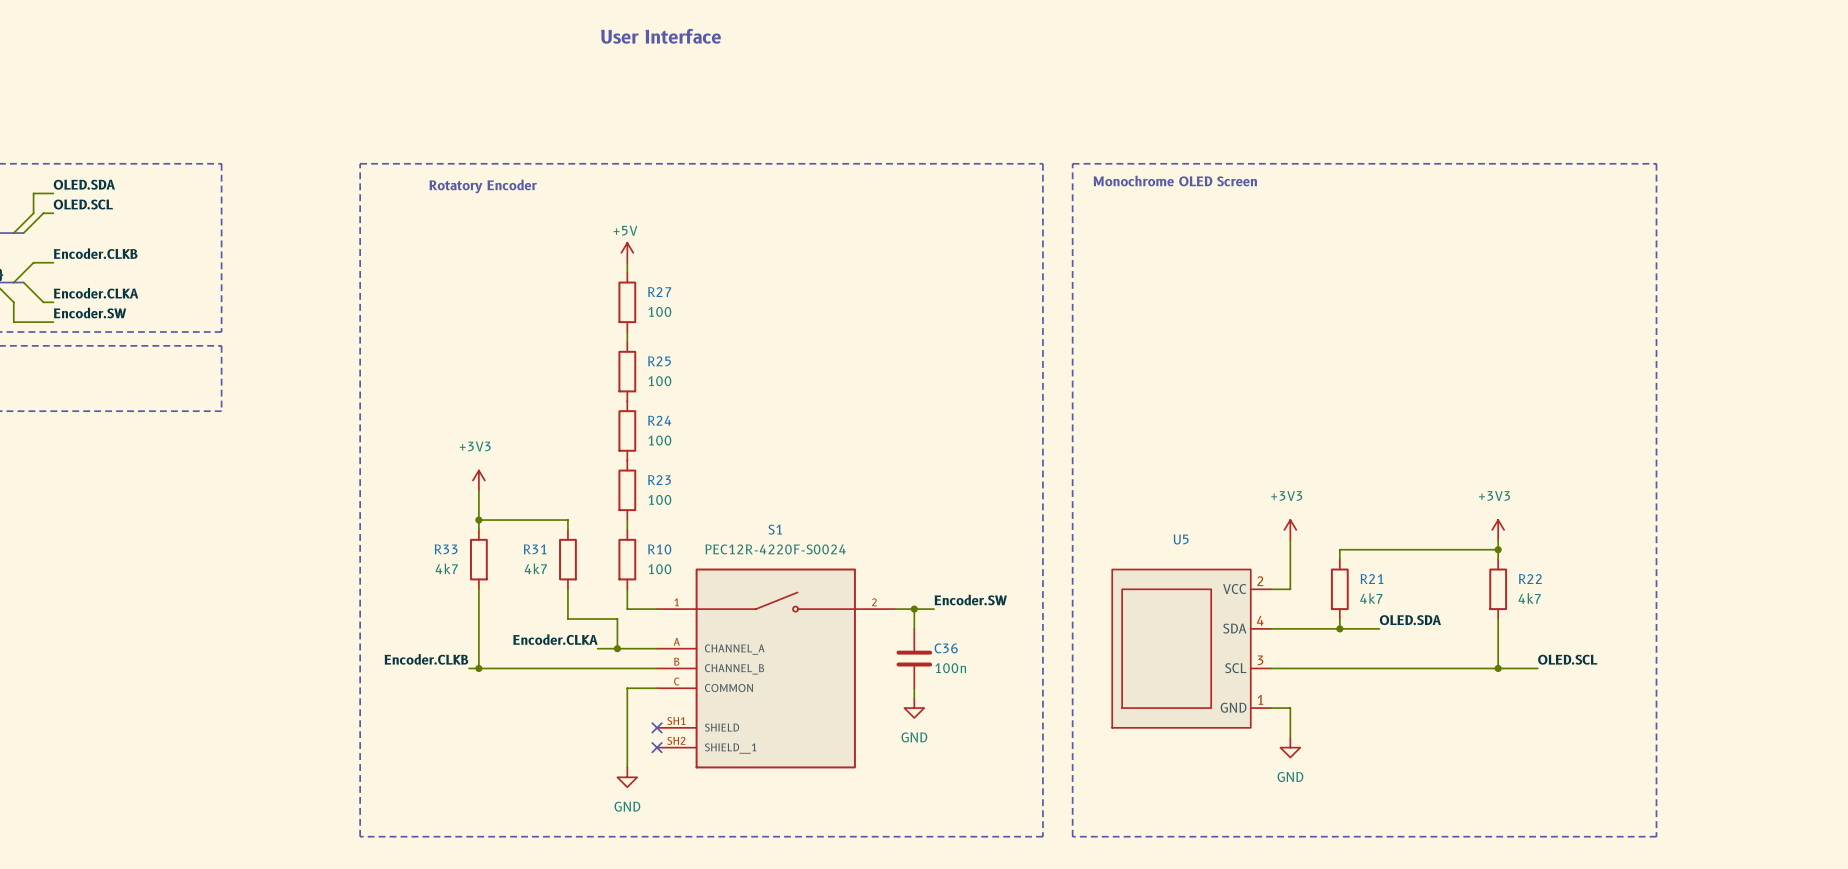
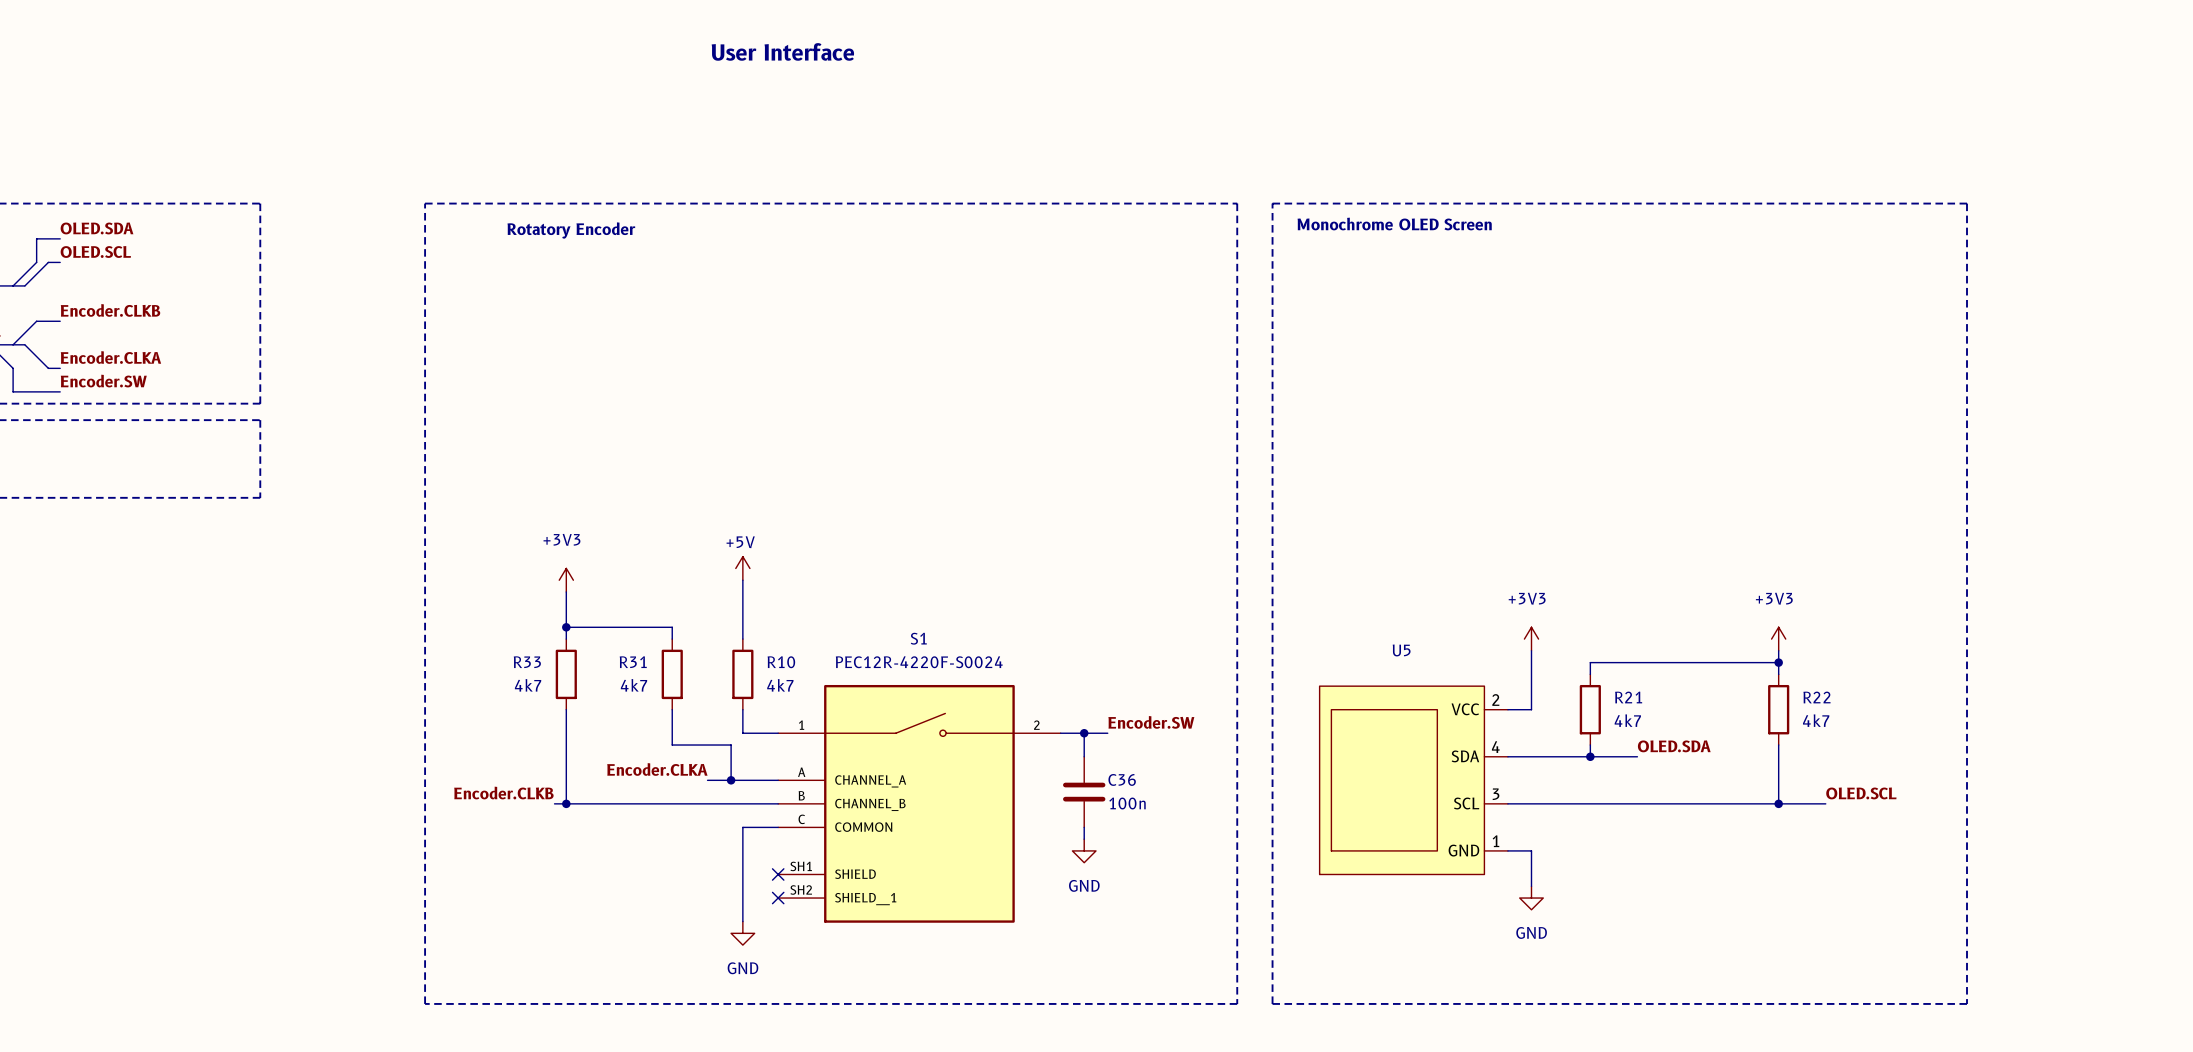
power symbol: +5V (627, 252) -> none
wire: (627, 262) (627, 272) -> none
R27: 100 (627, 302) -> none
wire: (627, 332) (627, 341) -> none
R25: 100 (627, 371) -> none
R24: 100 (627, 430) -> none
power symbol: none -> +5V (742, 568)
wire: none -> (742, 580) (742, 627)
R23: 100 (627, 490) -> none
R10 value: 100 (659, 569) -> 4k7 (780, 685)

